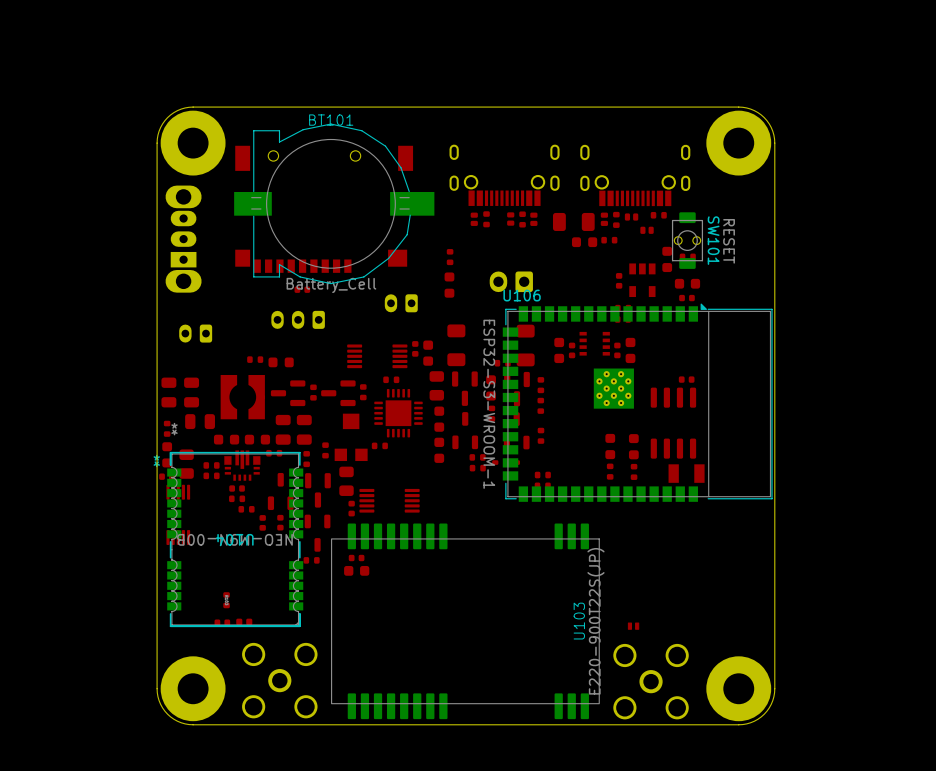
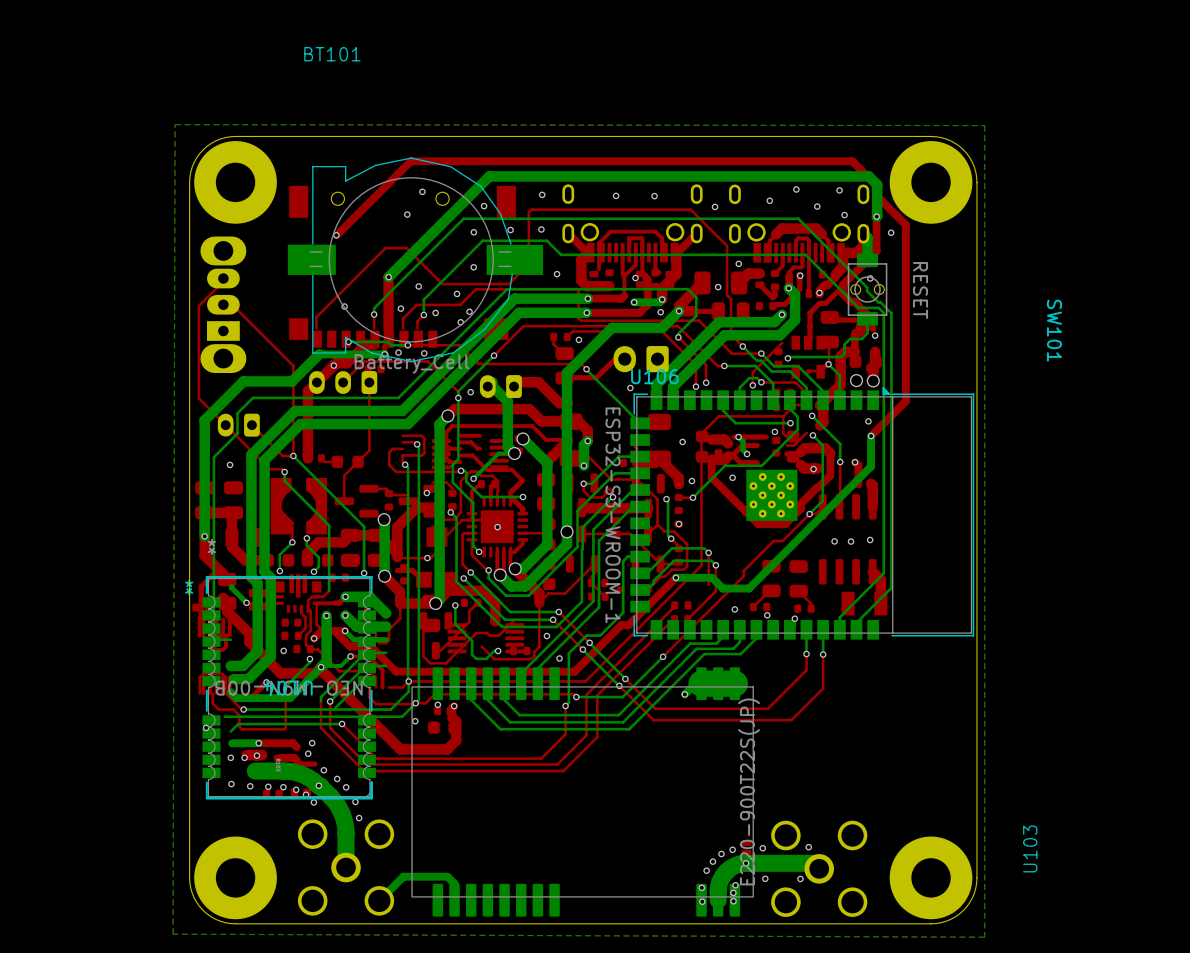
bottom zone outline: none -> (175, 124) (173, 934) (984, 937) (984, 125) (175, 124)
BT101 name position: BT101 (331, 120) -> BT101 (332, 54)
via: none -> (796, 189)
via: none -> (839, 190)
via: none -> (422, 191)
via: none -> (542, 194)
via: none -> (616, 195)
via: none -> (654, 196)
via: none -> (769, 200)
via: none -> (484, 206)
via: none -> (715, 206)
via: none -> (817, 206)
via: none -> (407, 214)
via: none -> (844, 215)
bottom track: none -> (876, 216) (877, 184) (868, 176) (489, 176) (388, 277)
via: none -> (876, 216)
top track: none -> (876, 216) (876, 251) (842, 284) (842, 293) (866, 313) (866, 326) (860, 332) (854, 333) (854, 351) (845, 351) (840, 356) (840, 384) (820, 405)
via: none -> (510, 230)
via: none -> (541, 229)
via: none -> (473, 232)
via: none -> (891, 232)
top track: none -> (568, 233) (588, 252) (581, 259) (581, 280) (586, 286) (609, 286)
top track: none -> (696, 233) (676, 252) (676, 274) (662, 288) (662, 299)
top track: none -> (863, 233) (863, 246) (856, 252) (843, 252) (843, 267) (827, 285) (824, 285) (820, 289) (820, 293)
bottom track: none -> (863, 233) (867, 237) (867, 260)
top track: none -> (336, 235) (410, 161) (852, 161) (875, 184) (875, 194) (905, 224) (905, 401) (871, 436)
via: none -> (336, 235)
top track: none -> (622, 252) (622, 274) (624, 276)
top track: none -> (629, 252) (629, 238) (641, 238) (642, 271) (647, 279) (647, 304) (639, 312) (586, 312)
top track: none -> (635, 252) (635, 264) (624, 276)
top track: none -> (655, 253) (655, 268) (659, 272)
top track: none -> (662, 252) (662, 238) (655, 231) (610, 231) (599, 243) (599, 269)
top track: none -> (782, 252) (782, 265) (775, 273)
top track: none -> (795, 252) (795, 240) (798, 238) (806, 238) (809, 240) (809, 293)
top track: none -> (802, 252) (802, 266) (793, 267) (789, 272) (788, 287)
top track: none -> (828, 252) (828, 241) (816, 228) (782, 228) (769, 241) (769, 252)
via: none -> (738, 263)
via: none -> (473, 267)
top track: none -> (759, 273) (748, 273) (739, 282)
via: none -> (557, 274)
top track: none -> (624, 276) (624, 295) (621, 298) (587, 298)
via: none -> (800, 275)
top track: none -> (388, 277) (388, 328) (386, 330) (384, 354)
via: none -> (388, 277)
top track: none -> (799, 276) (799, 289) (784, 304) (772, 306)
top track: none -> (225, 279) (198, 306) (198, 398) (269, 469) (281, 469) (284, 472)
via: none -> (635, 278)
via: none -> (870, 278)
top track: none -> (702, 282) (679, 306) (679, 311) (718, 311)
top track: none -> (759, 284) (772, 297) (775, 295) (775, 286)
via: none -> (418, 286)
top track: none -> (842, 286) (825, 303) (819, 303) (810, 312) (810, 339) (807, 342)
via: none -> (718, 287)
bottom track: none -> (788, 288) (795, 294) (795, 320) (779, 335) (724, 335) (673, 386) (673, 400)
via: none -> (788, 288)
via: none -> (819, 292)
via: none -> (457, 293)
bottom track: none -> (587, 298) (514, 298) (402, 410) (295, 410) (251, 454) (251, 576) (257, 583) (257, 651) (242, 665) (230, 665)
via: none -> (587, 298)
bottom track: none -> (662, 299) (659, 302) (634, 302)
via: none -> (662, 299)
via: none -> (634, 302)
part footprint: [571, 237, 598, 248] -> [712, 302, 750, 321]
top track: none -> (223, 304) (232, 304) (293, 365) (293, 456) (282, 456) (251, 425)
via: none -> (344, 306)
SW101 position: (687, 240) -> (867, 289)
SW101 name position: SW101 (713, 240) -> SW101 (1054, 330)
via: none -> (400, 308)
via: none -> (469, 311)
via: none -> (660, 312)
bottom track: none -> (679, 311) (662, 327) (612, 327) (567, 372) (567, 544) (525, 586) (511, 586) (500, 575)
via: none -> (679, 311)
via: none -> (435, 312)
bottom track: none -> (586, 312) (519, 312) (407, 424) (300, 424) (264, 460) (264, 571) (270, 577) (270, 656) (248, 679) (233, 679)
via: none -> (586, 312)
top track: none -> (374, 314) (374, 328)
bottom track: none -> (374, 314) (374, 308) (463, 218) (798, 218) (867, 287) (867, 291) (891, 313) (891, 587) (856, 622) (856, 629)
via: none -> (374, 314)
bottom track: none -> (781, 314) (774, 322) (719, 322) (656, 384) (656, 400)
via: none -> (781, 314)
part footprint: [662, 246, 673, 273] -> [820, 311, 840, 349]
top track: none -> (423, 315) (417, 321) (417, 328)
bottom track: none -> (423, 315) (423, 299) (482, 240) (547, 240) (561, 254) (805, 254) (858, 307) (878, 307) (883, 313) (883, 573) (839, 617) (839, 629)
via: none -> (423, 315)
top track: none -> (829, 317) (832, 320) (855, 320)
bottom track: none -> (867, 318) (867, 333) (861, 338) (850, 338) (844, 344) (844, 353) (841, 357) (787, 358)
via: none -> (460, 322)
top track: none -> (316, 328) (316, 317) (385, 248) (406, 248) (442, 284) (508, 284) (528, 264) (528, 212) (531, 209) (690, 209) (727, 245) (727, 295) (731, 299) (731, 334) (742, 346)
top track: none -> (403, 328) (403, 318) (416, 304) (460, 304) (475, 289) (576, 289) (578, 291) (578, 318) (581, 320) (699, 320) (731, 353) (761, 353)
part rotation: 0° (450, 257) -> 90° clockwise (560, 337)
via: none -> (875, 335)
top track: none -> (553, 337) (553, 344) (562, 353)
top track: none -> (567, 337) (572, 331) (662, 331) (695, 365) (695, 386)
top track: none -> (678, 337) (706, 365) (706, 382)
bottom track: none -> (678, 337) (678, 333) (696, 315) (696, 297) (687, 289) (507, 289) (398, 397) (252, 397) (237, 413) (237, 433) (213, 457) (213, 634) (219, 639) (230, 639)
via: none -> (678, 337)
via: none -> (578, 339)
bottom track: none -> (348, 341) (388, 341) (391, 345) (407, 345)
via: none -> (348, 341)
top track: none -> (782, 342) (752, 372) (752, 385)
top track: none -> (373, 344) (365, 344) (347, 363) (336, 363) (307, 391) (307, 458)
top track: none -> (407, 345) (459, 345) (478, 364) (581, 364) (586, 369)
via: none -> (407, 345)
bottom track: none -> (742, 346) (757, 360) (761, 360) (771, 371) (790, 371) (806, 387) (806, 400)
via: none -> (742, 346)
part footprint: [444, 272, 455, 298] -> [555, 347, 574, 385]
top track: none -> (828, 347) (828, 363) (821, 370) (807, 370)
via: none -> (398, 352)
top track: none -> (622, 352) (596, 377) (566, 377) (562, 373)
top track: none -> (875, 351) (875, 364) (871, 368) (873, 370) (873, 380)
bottom track: none -> (319, 354) (292, 381) (243, 381) (204, 420) (204, 536)
via: none -> (384, 354)
via: none -> (424, 353)
bottom track: none -> (761, 353) (774, 366) (798, 366) (823, 391) (823, 400)
via: none -> (761, 353)
bottom track: none -> (384, 354) (319, 354)
top track: none -> (494, 355) (523, 326) (678, 326) (717, 365) (724, 365)
bottom track: none -> (494, 355) (458, 391) (458, 459) (452, 466)
via: none -> (494, 355)
via: none -> (787, 358)
bottom track: none -> (828, 364) (839, 375) (839, 400)
via: none -> (828, 364)
via: none -> (333, 365)
bottom track: none -> (724, 366) (755, 366) (773, 383) (773, 400)
via: none -> (724, 365)
bottom track: none -> (586, 369) (640, 423)
via: none -> (586, 369)
via: none -> (856, 380)
via: none -> (873, 380)
bottom track: none -> (492, 382) (492, 386) (507, 401) (507, 446) (514, 453) (498, 453) (473, 478)
top track: none -> (518, 382) (538, 382) (559, 403) (567, 403)
top track: none -> (761, 382) (795, 382) (807, 393) (807, 405) (794, 405) (783, 416)
bottom track: none -> (761, 382) (757, 378) (749, 378) (739, 387) (739, 400)
via: none -> (761, 382)
top track: none -> (343, 382) (364, 361) (427, 361) (458, 391) (458, 397)
top track: none -> (369, 382) (369, 450) (344, 475) (344, 501)
via: none -> (706, 382)
via: none -> (752, 385)
via: none -> (695, 386)
via: none -> (630, 388)
via: none -> (470, 392)
via: none -> (458, 397)
bottom track: none -> (723, 400) (723, 410) (735, 423) (790, 423)
bottom track: none -> (789, 400) (789, 408) (797, 416) (797, 429) (761, 465) (724, 465) (692, 497)
top track: none -> (820, 405) (823, 408) (823, 422) (820, 425)
part position: (298, 319) -> (343, 382)
top track: none -> (447, 415) (454, 409) (529, 409) (541, 421) (578, 421) (587, 430) (587, 441)
bottom track: none -> (447, 415) (439, 424) (439, 599) (435, 603)
via: none -> (447, 415)
top track: none -> (783, 416) (718, 416) (701, 433) (701, 565) (585, 681) (408, 681) (402, 687) (389, 687)
top track: none -> (783, 416) (783, 433) (786, 437)
bottom track: none -> (812, 415) (840, 443) (840, 462)
via: none -> (812, 415)
via: none -> (868, 421)
via: none -> (790, 423)
via: none -> (774, 431)
top track: none -> (806, 432) (793, 445) (786, 445)
top track: none -> (402, 435) (421, 435) (424, 438) (424, 452) (421, 455) (402, 455) (402, 462) (405, 464)
top track: none -> (480, 435) (460, 435)
bottom track: none -> (812, 435) (822, 445) (822, 500) (809, 514)
via: none -> (812, 435)
bottom track: none -> (738, 437) (742, 441) (742, 449) (747, 454)
via: none -> (738, 437)
top track: none -> (766, 437) (734, 437)
bottom track: none -> (871, 436) (871, 466) (749, 588) (722, 588) (712, 577) (675, 577)
via: none -> (871, 436)
part: (594, 343) -> none
bottom track: none -> (523, 438) (547, 463) (547, 544) (523, 568) (515, 568)
via: none -> (523, 438)
top track: none -> (711, 439) (724, 439) (728, 443)
bottom track: none -> (587, 441) (583, 444) (583, 465)
via: none -> (587, 441)
via: none -> (682, 441)
top track: none -> (402, 442) (415, 442) (417, 444)
top track: none -> (460, 442) (471, 442) (477, 448) (480, 448)
bottom track: none -> (417, 444) (418, 446) (418, 700) (402, 716) (224, 716)
via: none -> (417, 444)
top track: none -> (634, 445) (636, 448) (636, 462) (655, 462) (659, 458) (678, 478) (678, 484)
top track: none -> (757, 445) (742, 445) (731, 456)
top track: none -> (402, 448) (392, 448) (389, 452) (389, 465) (396, 471) (461, 470)
top track: none -> (449, 448) (446, 446) (446, 432) (452, 426) (532, 426) (546, 439) (567, 439) (546, 462)
top track: none -> (449, 448) (446, 451) (446, 458) (449, 462) (460, 462)
top track: none -> (460, 448) (449, 448)
part: (428, 353) -> none
via: none -> (514, 453)
top track: none -> (730, 453) (728, 456) (733, 456) (740, 462) (757, 462)
via: none -> (747, 454)
top track: none -> (786, 454) (798, 454) (804, 448) (825, 448) (830, 453) (830, 475) (800, 503) (800, 508) (785, 524) (758, 524) (711, 477) (711, 459) (724, 459) (728, 456)
bottom track: none -> (293, 456) (364, 526) (364, 573)
via: none -> (293, 456)
top track: none -> (460, 455) (472, 455) (487, 470) (512, 470) (522, 480) (510, 492)
bottom track: none -> (640, 456) (618, 456) (591, 483) (583, 483)
top track: none -> (321, 458) (324, 461) (337, 461)
top track: none -> (840, 462) (839, 506)
via: none -> (840, 462)
top track: none -> (855, 462) (858, 465) (858, 483)
via: none -> (855, 462)
via: none -> (230, 464)
bottom track: none -> (405, 464) (408, 467) (408, 691) (390, 709) (243, 709)
via: none -> (405, 464)
top track: none -> (800, 465) (804, 468) (817, 468)
via: none -> (583, 465)
bottom track: none -> (452, 466) (452, 482) (473, 502) (473, 545) (479, 551)
via: none -> (813, 469)
bottom track: none -> (461, 470) (466, 472) (466, 481) (481, 496) (523, 496)
via: none -> (461, 470)
bottom track: none -> (284, 472) (284, 480) (329, 525) (329, 591)
via: none -> (284, 472)
bottom track: none -> (640, 473) (615, 473) (577, 510) (577, 546) (528, 595) (505, 595) (488, 578) (488, 570)
via: none -> (732, 477)
via: none -> (473, 478)
via: none -> (691, 481)
top track: none -> (433, 482) (446, 482) (452, 488)
top track: none -> (569, 483) (569, 466) (579, 456) (588, 456) (611, 479) (631, 479) (635, 483) (641, 483) (657, 499) (657, 524)
top track: none -> (583, 483) (583, 490) (590, 497) (602, 497) (608, 488) (612, 492) (612, 497)
via: none -> (583, 483)
top track: none -> (870, 483) (872, 485) (872, 506)
top track: none -> (477, 486) (471, 491) (471, 520)
top track: none -> (490, 486) (490, 501)
top track: none -> (368, 488) (386, 488) (392, 495) (408, 495)
bottom track: none -> (640, 489) (633, 489) (593, 529) (593, 601) (521, 673) (521, 683)
via: none -> (426, 493)
part: (491, 387) -> none
top track: none -> (510, 496) (522, 508) (522, 513)
via: none -> (523, 496)
bottom track: none -> (612, 497) (582, 527) (581, 601) (556, 626) (502, 626) (456, 581) (456, 518) (450, 512)
via: none -> (612, 497)
top track: none -> (692, 497) (678, 497)
via: none -> (692, 497)
bottom track: none -> (666, 499) (668, 500) (668, 535) (671, 538)
via: none -> (666, 499)
top track: none -> (497, 501) (498, 481) (492, 475) (481, 475) (476, 471) (470, 471) (460, 481) (460, 512) (453, 519) (440, 519) (429, 531)
top track: none -> (275, 506) (292, 522) (292, 542)
bottom track: none -> (640, 506) (633, 506) (599, 540) (599, 607) (537, 668) (537, 683)
top track: none -> (822, 506) (815, 514) (809, 514) (782, 541) (773, 541) (743, 570) (743, 576) (663, 656)
top track: none -> (433, 507) (416, 507) (397, 527) (398, 558) (430, 558) (443, 545) (443, 538) (462, 520) (490, 520)
top track: none -> (648, 508) (582, 508)
via: none -> (450, 512)
via: none -> (809, 514)
bottom track: none -> (384, 519) (384, 576)
via: none -> (384, 519)
top track: none -> (657, 524) (647, 534)
top track: none -> (657, 524) (664, 531) (674, 531) (687, 544) (687, 566) (683, 569) (671, 569) (664, 576) (661, 576) (648, 589)
via: none -> (678, 524)
via: none -> (497, 527)
via: none -> (567, 531)
top track: none -> (471, 533) (462, 534) (462, 564) (470, 572)
top track: none -> (542, 533) (522, 533)
top track: none -> (582, 533) (630, 533) (660, 564) (677, 564) (678, 562)
via: none -> (204, 536)
bottom track: none -> (306, 538) (306, 545) (318, 557) (318, 566) (313, 571)
via: none -> (306, 538)
top track: none -> (671, 538) (678, 548)
via: none -> (671, 538)
top track: none -> (471, 539) (471, 554) (488, 570)
top track: none -> (522, 539) (522, 543) (514, 552) (510, 552) (510, 564) (539, 593) (539, 602)
via: none -> (870, 539)
via: none -> (834, 541)
via: none -> (850, 541)
bottom track: none -> (292, 542) (279, 554) (279, 571)
via: none -> (292, 542)
part: (167, 428) -> none
via: none -> (479, 551)
top track: none -> (503, 552) (503, 571) (500, 575) (497, 572) (497, 552)
top track: none -> (708, 552) (708, 584)
bottom track: none -> (708, 552) (704, 548) (672, 548) (647, 573) (640, 573)
via: none -> (708, 552)
part footprint: [605, 433, 616, 460] -> [762, 559, 781, 598]
top track: none -> (397, 553) (379, 535) (350, 535) (343, 542) (318, 542) (307, 553) (307, 560)
part footprint: [628, 434, 639, 460] -> [789, 560, 808, 598]
bottom track: none -> (640, 556) (627, 556) (623, 561) (623, 612) (600, 635) (586, 635) (568, 653) (568, 702) (565, 705)
via: none -> (427, 558)
top track: none -> (268, 560) (245, 560) (231, 546) (231, 514) (233, 512) (204, 512) (204, 555) (223, 574) (213, 574) (201, 586) (202, 615) (199, 618) (199, 635)
top track: none -> (715, 565) (715, 591) (687, 619)
bottom track: none -> (715, 565) (711, 560) (673, 560) (647, 589) (640, 589)
via: none -> (715, 565)
part position: (379, 445) -> (471, 602)
via: none -> (515, 568)
top track: none -> (397, 570) (412, 570) (415, 574)
via: none -> (488, 570)
via: none -> (279, 571)
via: none -> (313, 571)
top track: none -> (872, 571) (880, 579) (880, 603)
via: none -> (364, 573)
bottom track: none -> (470, 572) (510, 612) (558, 612)
via: none -> (470, 572)
via: none -> (500, 575)
top track: none -> (384, 576) (400, 591) (400, 618) (389, 629) (389, 640) (385, 643) (379, 643) (375, 639) (375, 629)
via: none -> (384, 576)
bottom track: none -> (463, 578) (505, 619) (553, 619)
via: none -> (463, 578)
top track: none -> (675, 577) (628, 625) (621, 625) (574, 671) (412, 671)
via: none -> (675, 577)
part: (167, 454) -> none
part: (306, 459) -> none
bottom track: none -> (231, 586) (246, 602)
top track: none -> (329, 591) (323, 596) (311, 597) (308, 600) (308, 608) (310, 611) (310, 630) (306, 635) (306, 644) (310, 649) (317, 649) (339, 671) (369, 671) (375, 677) (375, 687)
top track: none -> (771, 590) (753, 607)
top track: none -> (798, 591) (811, 603) (811, 608)
bottom track: none -> (345, 596) (369, 596) (386, 613)
via: none -> (345, 596)
top track: none -> (605, 596) (591, 583) (591, 576) (594, 573) (594, 563) (565, 593) (548, 593) (539, 602)
top track: none -> (222, 598) (227, 602) (227, 611) (249, 633) (249, 642) (280, 673) (314, 673) (321, 667) (321, 670) (400, 749) (447, 749) (456, 740) (456, 721) (452, 717) (452, 707) (454, 706)
part rotation: 0° (610, 471) -> 90° clockwise (760, 607)
part rotation: 0° (634, 471) -> 90° clockwise (804, 608)
via: none -> (246, 602)
top track: none -> (477, 602) (469, 611) (469, 622) (440, 650) (435, 650)
top track: none -> (539, 602) (539, 646) (531, 659) (494, 659) (481, 646)
top track: none -> (400, 603) (435, 603) (448, 590) (483, 590) (495, 602) (495, 621)
via: none -> (435, 603)
bottom track: none -> (455, 605) (455, 624) (472, 641) (472, 654) (476, 658) (486, 658) (494, 651) (498, 651)
via: none -> (455, 605)
top track: none -> (674, 605) (586, 694) (586, 735) (557, 764) (366, 764) (330, 728) (330, 701)
top track: none -> (301, 608) (301, 613) (305, 617) (305, 628) (298, 635)
via: none -> (734, 609)
top track: none -> (558, 612) (589, 642)
via: none -> (558, 612)
bottom track: none -> (345, 615) (356, 626) (386, 626)
via: none -> (345, 615)
via: none -> (767, 615)
bottom track: none -> (326, 615) (326, 661) (321, 667)
via: none -> (326, 615)
top track: none -> (673, 619) (597, 695) (597, 737) (563, 771) (364, 771) (320, 728) (320, 701)
via: none -> (794, 618)
top track: none -> (514, 620) (498, 635) (476, 632) (446, 663) (430, 663) (423, 656) (423, 620)
top track: none -> (553, 619) (582, 649)
via: none -> (553, 619)
part: (317, 490) -> none
part: (280, 491) -> none
top track: none -> (321, 629) (316, 624) (316, 603) (339, 602) (345, 596) (356, 597) (365, 606) (365, 612) (369, 616) (369, 629)
top track: none -> (321, 630) (314, 638)
top track: none -> (345, 630) (334, 630) (350, 646) (370, 646) (396, 671) (412, 671)
bottom track: none -> (345, 630) (353, 639) (386, 639)
via: none -> (345, 630)
bottom track: none -> (723, 629) (723, 636) (716, 643) (690, 643) (618, 715) (519, 715) (504, 700) (504, 683)
bottom track: none -> (739, 629) (739, 642) (733, 648) (696, 648) (623, 722) (510, 722) (487, 700) (487, 683)
bottom track: none -> (756, 629) (756, 638) (740, 654) (704, 654) (629, 729) (500, 729) (471, 700) (471, 683)
bottom track: none -> (806, 629) (806, 654)
bottom track: none -> (823, 629) (823, 654)
top track: none -> (225, 635) (225, 646) (222, 650) (216, 650) (212, 646) (212, 635) (225, 635)
via: none -> (546, 636)
via: none -> (314, 638)
part footprint: [348, 500, 355, 517] -> [419, 612, 453, 660]
bottom track: none -> (589, 642) (625, 678)
via: none -> (589, 642)
bottom track: none -> (582, 649) (619, 685)
via: none -> (582, 649)
via: none -> (283, 650)
via: none -> (498, 651)
part: none -> (520, 651)
bottom track: none -> (386, 652) (365, 652) (320, 697) (320, 701)
top track: none -> (806, 654) (806, 670) (767, 708) (655, 708) (625, 678)
via: none -> (806, 654)
top track: none -> (823, 654) (823, 688) (791, 720) (653, 720) (619, 685)
via: none -> (823, 654)
top track: none -> (350, 656) (368, 656) (382, 670) (382, 687)
bottom track: none -> (350, 656) (341, 665) (321, 667)
via: none -> (350, 656)
bottom track: none -> (663, 656) (622, 697) (576, 697)
via: none -> (663, 656)
via: none -> (559, 658)
bottom track: none -> (309, 659) (309, 662) (285, 686)
via: none -> (309, 659)
part: (262, 522) -> none
part: (280, 522) -> none
bottom track: none -> (386, 665) (365, 665) (330, 701)
bottom track: none -> (321, 667) (290, 698) (236, 698) (230, 692)
via: none -> (321, 667)
via: none -> (625, 678)
part: (317, 533) -> none
via: none -> (408, 681)
top track: none -> (266, 682) (249, 698)
via: none -> (266, 682)
bottom track: none -> (734, 683) (695, 683) (684, 694)
top track: none -> (285, 686) (284, 729) (242, 729) (239, 726) (239, 715) (233, 709) (218, 709) (212, 703) (212, 693)
via: none -> (619, 685)
bottom track: none -> (355, 687) (333, 709)
top track: none -> (369, 687) (369, 697) (376, 704) (425, 703) (434, 694) (573, 694) (576, 697)
top track: none -> (199, 693) (199, 677) (203, 673) (222, 673) (225, 677) (225, 693) (243, 709)
via: none -> (684, 694)
via: none -> (576, 697)
via: none -> (330, 701)
via: none -> (415, 703)
via: none -> (437, 704)
via: none -> (454, 706)
top track: none -> (565, 705) (565, 734) (541, 758) (376, 758) (342, 723)
via: none -> (565, 705)
via: none -> (243, 709)
part: (311, 560) -> none
via: none -> (415, 721)
via: none -> (342, 723)
bottom track: none -> (341, 724) (238, 724) (230, 731)
via: none -> (206, 727)
top track: none -> (258, 743) (293, 743) (296, 747)
bottom track: none -> (258, 743) (232, 743)
via: none -> (258, 743)
via: none -> (312, 743)
via: none -> (308, 753)
via: none -> (256, 755)
top track: none -> (262, 755) (246, 755)
via: none -> (230, 757)
via: none -> (244, 757)
top track: none -> (280, 757) (294, 757) (300, 764) (314, 764)
bottom track: none -> (255, 771) (288, 771) (299, 773) (314, 781) (330, 796) (339, 809) (345, 823) (346, 867)
via: none -> (323, 770)
via: none -> (337, 778)
via: none -> (231, 784)
via: none -> (250, 786)
via: none -> (318, 785)
via: none -> (268, 786)
via: none -> (283, 787)
via: none -> (346, 787)
via: none -> (296, 789)
U103 name position: U103 (579, 621) -> U103 (1030, 848)
via: none -> (306, 794)
part rotation: 0° (633, 626) -> 90° clockwise (746, 847)
part position: (633, 626) -> (746, 847)
via: none -> (313, 802)
via: none -> (355, 801)
via: none -> (359, 818)
via: none -> (808, 847)
via: none -> (762, 848)
via: none -> (732, 849)
via: none -> (721, 854)
via: none -> (712, 861)
via: none -> (746, 863)
bottom track: none -> (818, 868) (813, 863) (739, 864) (729, 868) (721, 878) (718, 888) (718, 900)
via: none -> (706, 870)
via: none -> (765, 878)
via: none -> (800, 878)
via: none -> (735, 885)
via: none -> (701, 887)
via: none -> (733, 892)
bottom track: none -> (454, 900) (454, 883) (447, 876) (403, 876) (379, 900)
via: none -> (702, 901)
via: none -> (733, 901)

